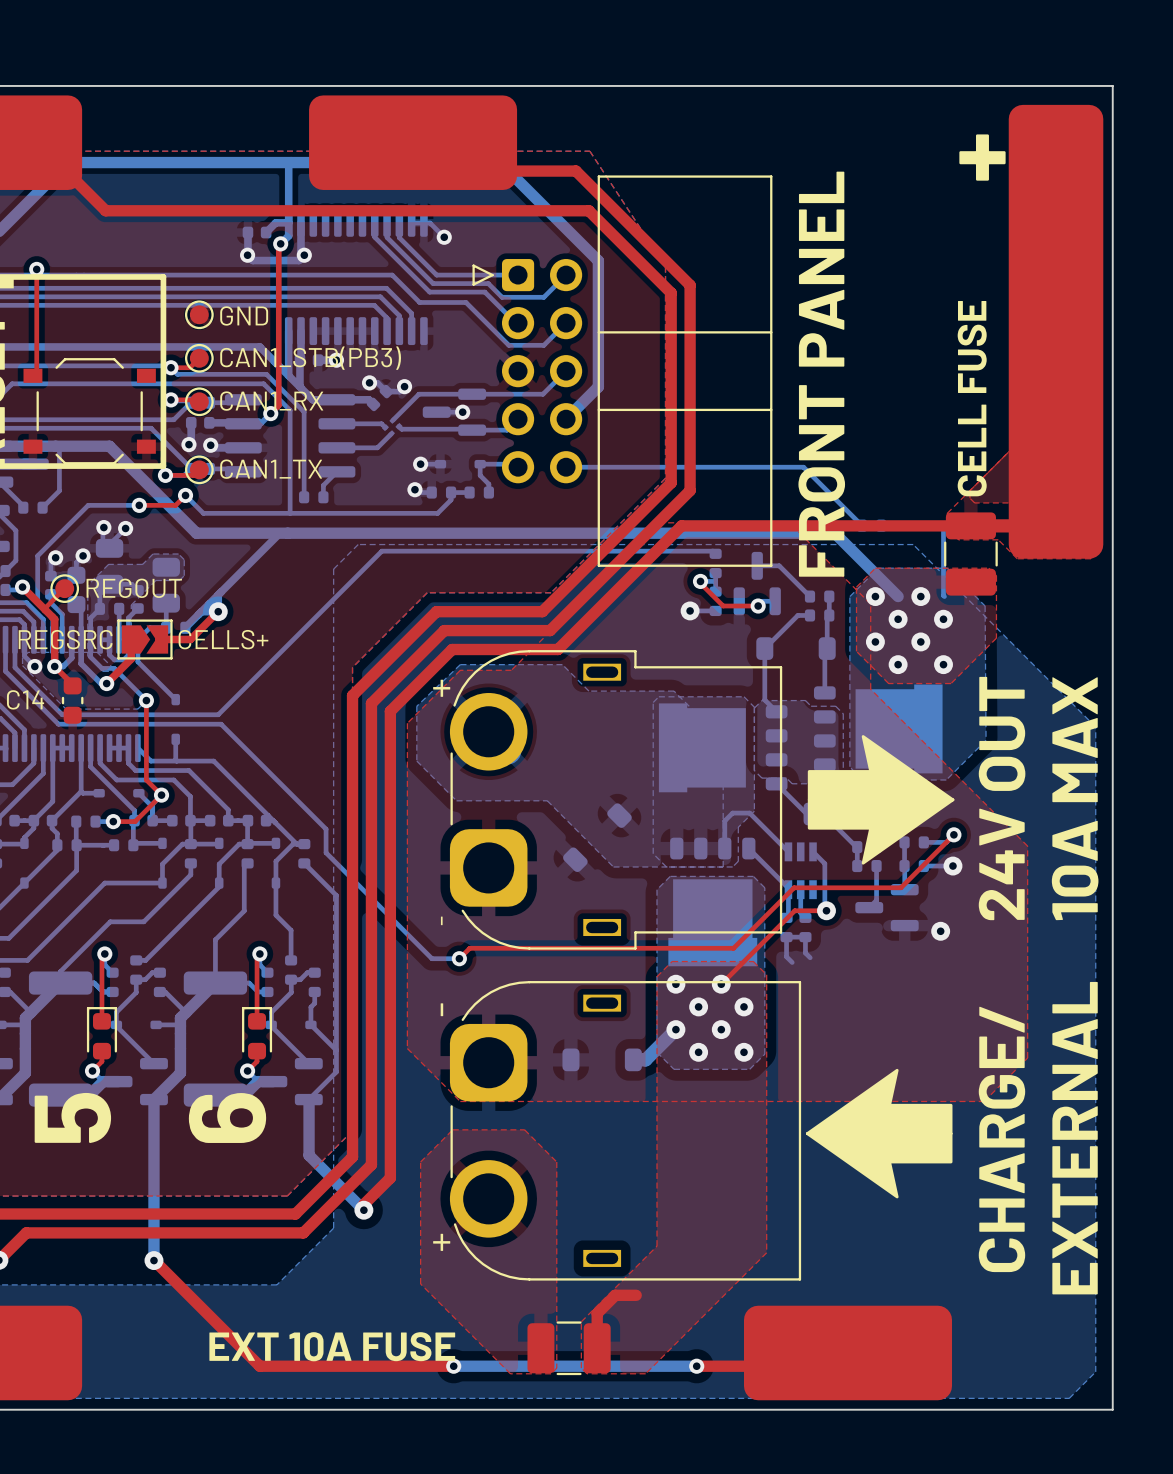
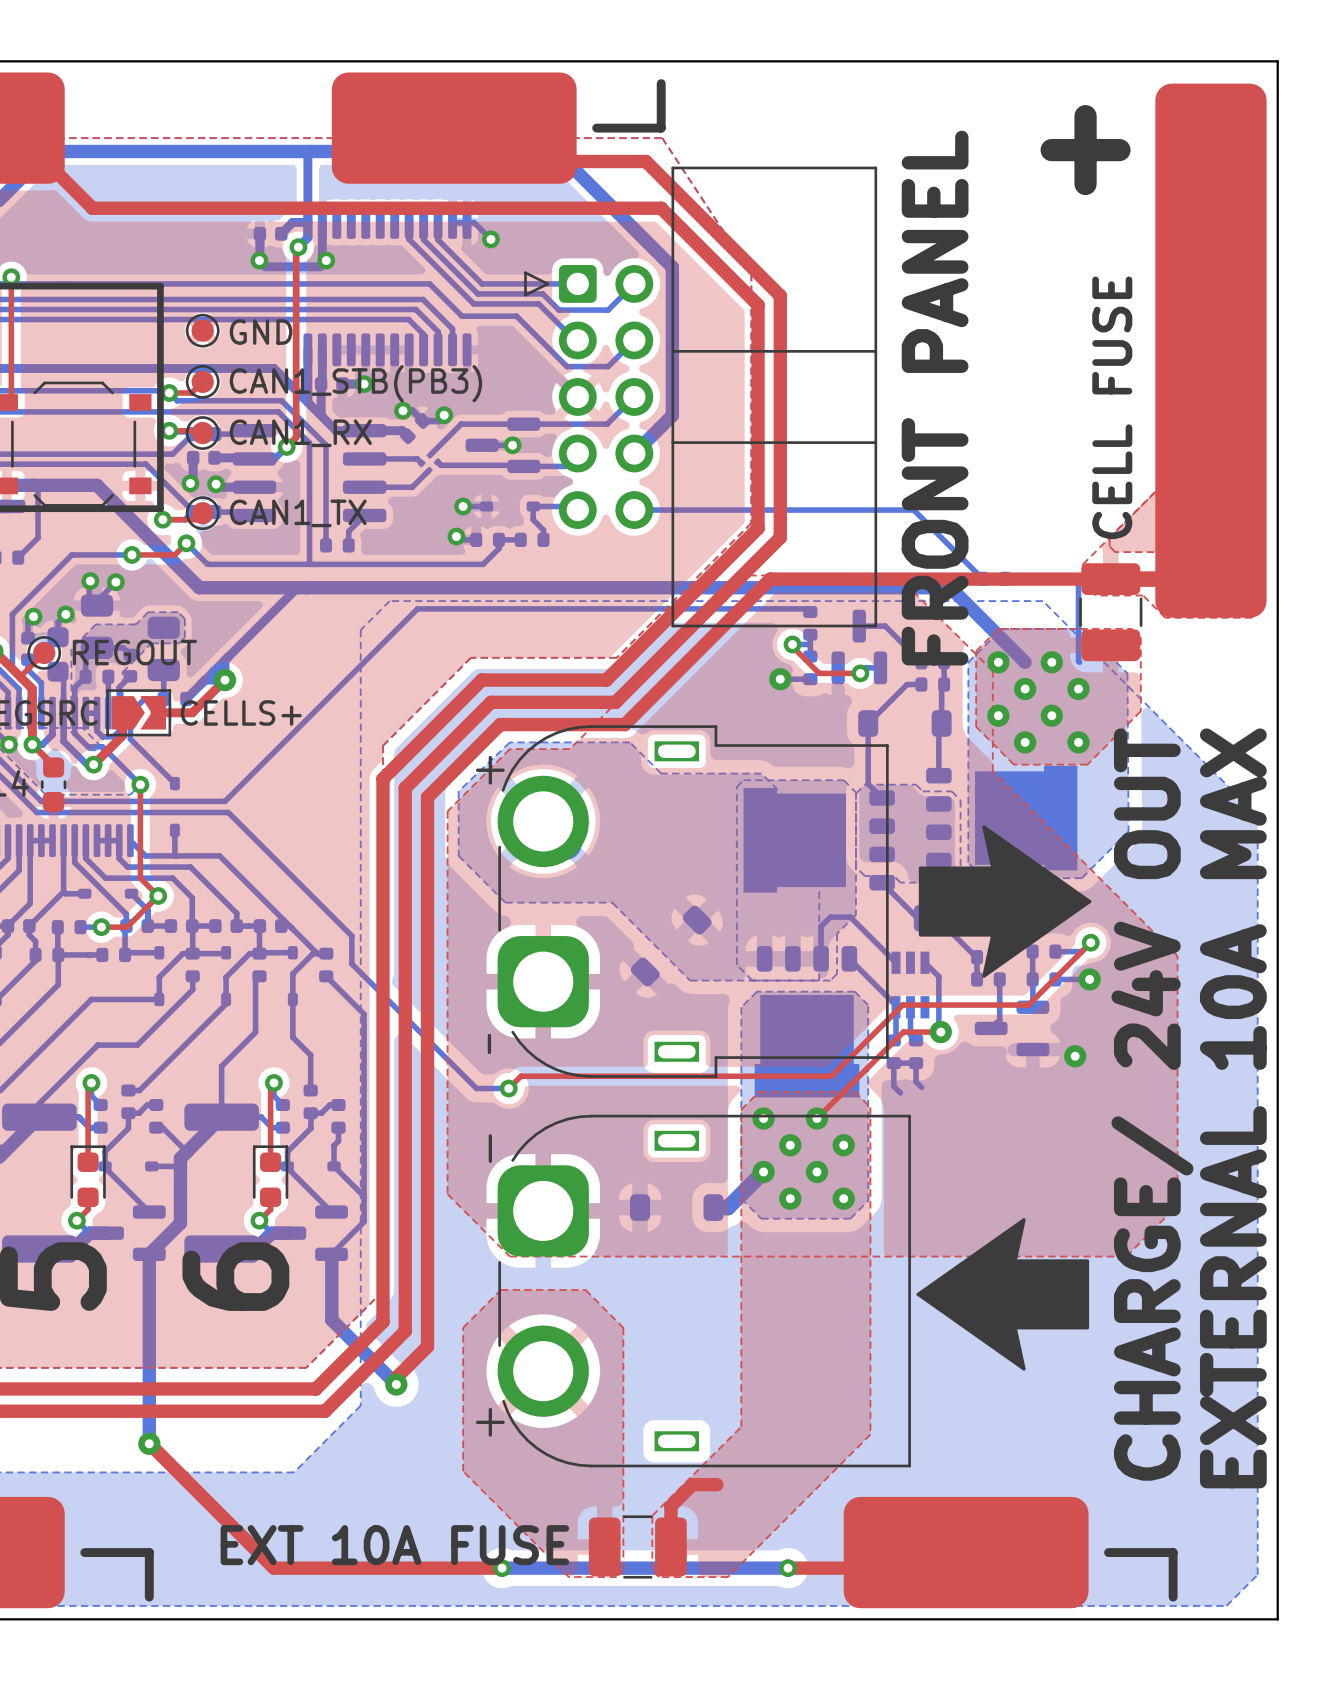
line: none -> (661, 83) (661, 128) (596, 128)
line: none -> (84, 1552) (149, 1552) (149, 1597)
line: none -> (1108, 1552) (1173, 1552) (1173, 1597)

